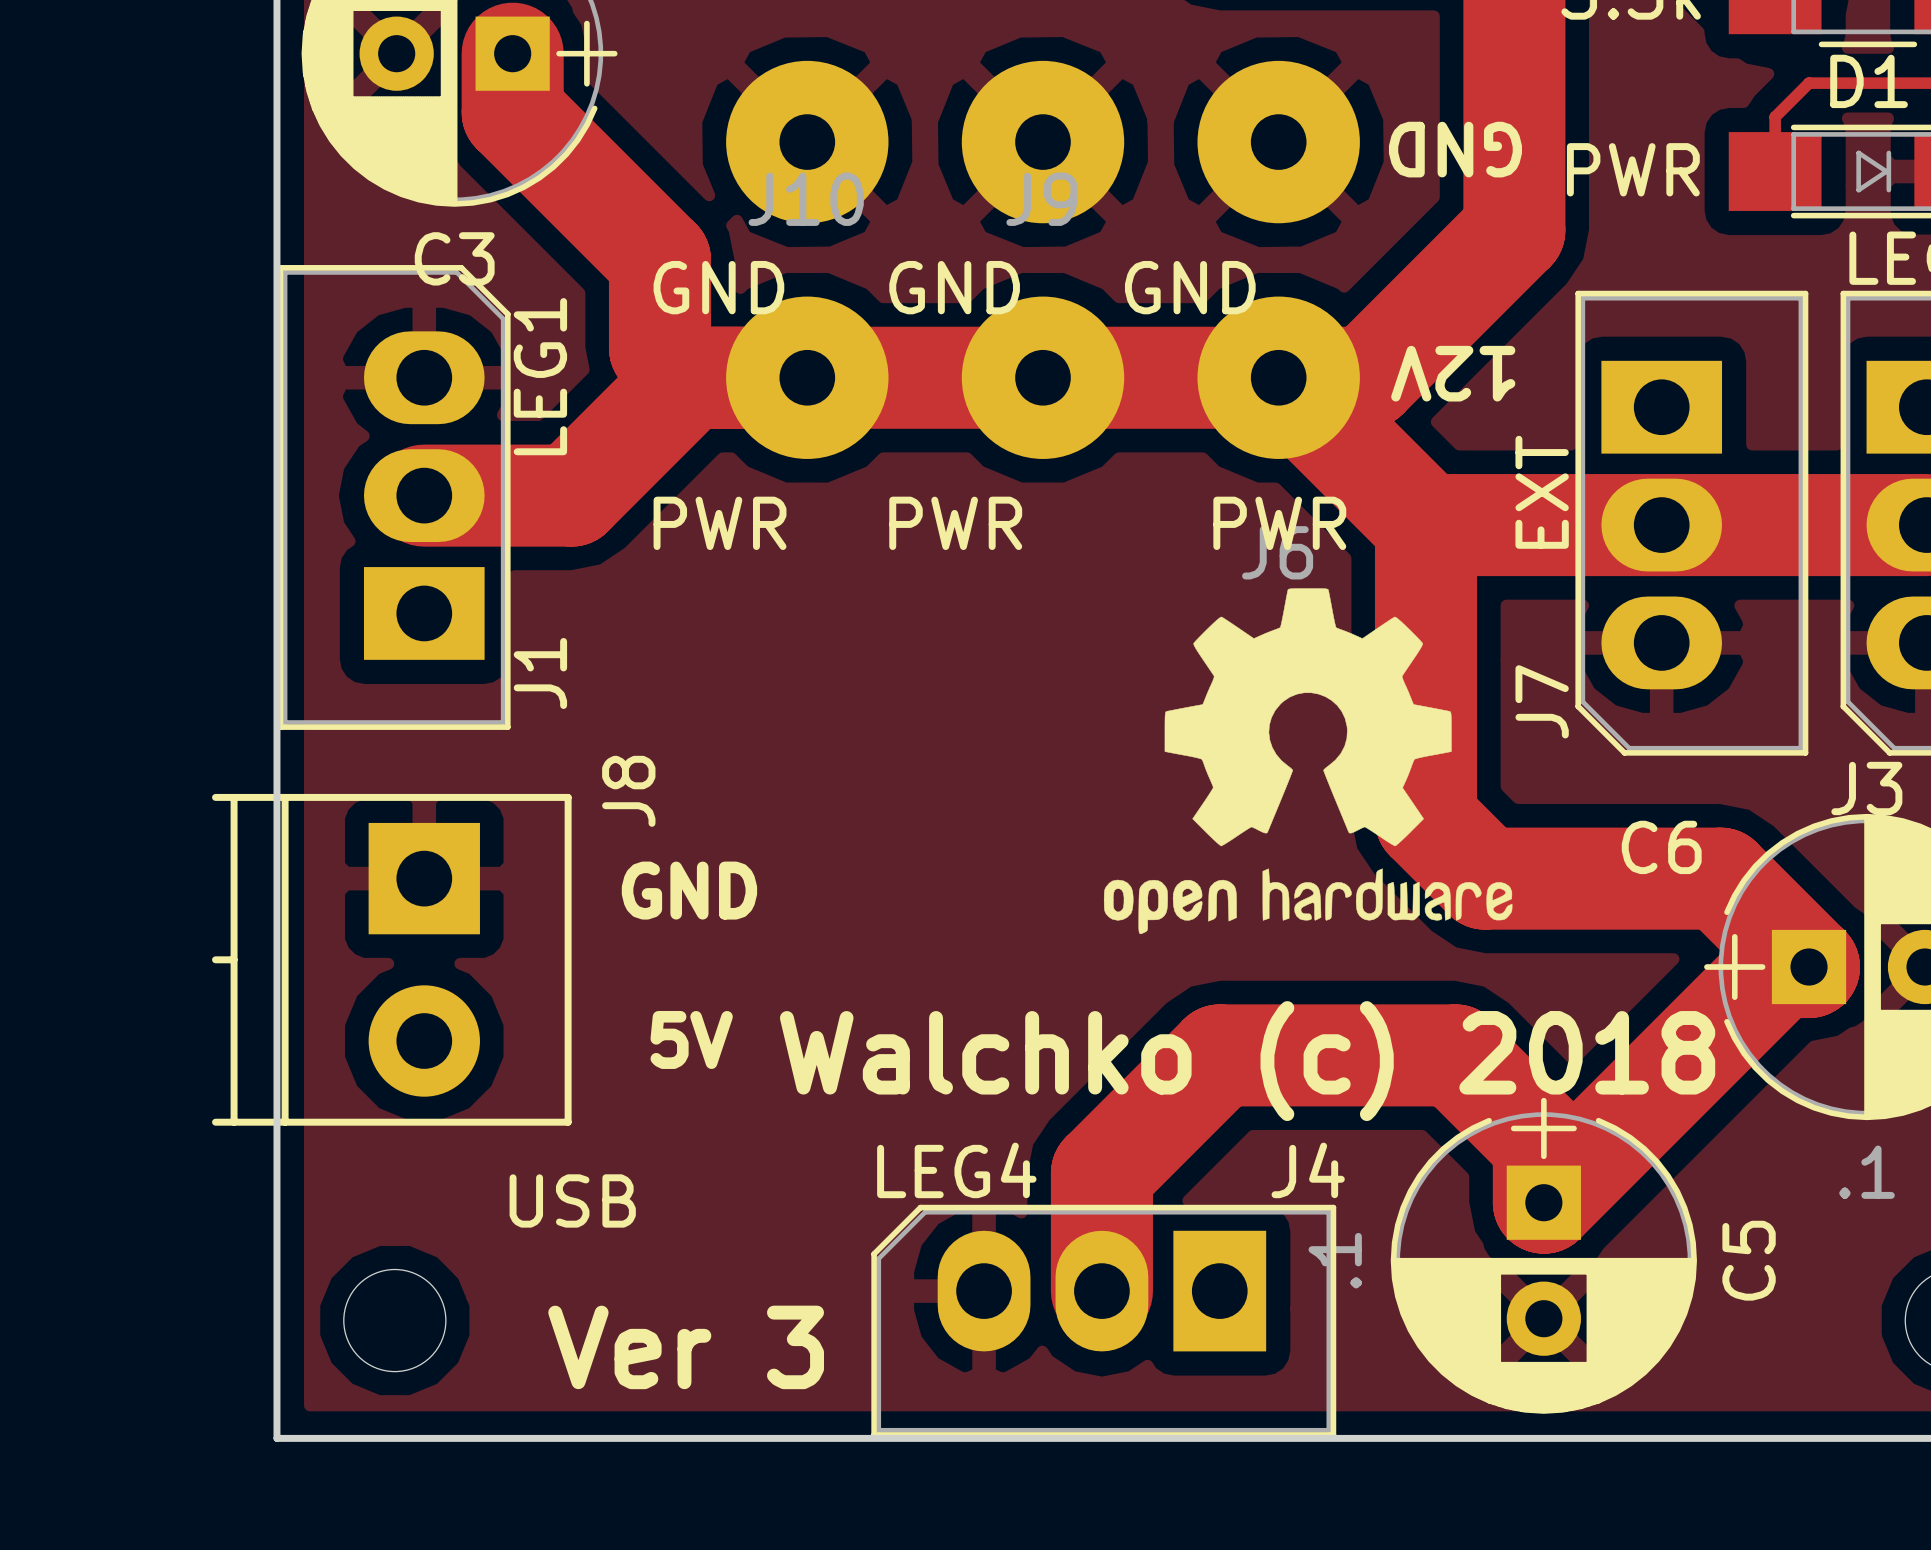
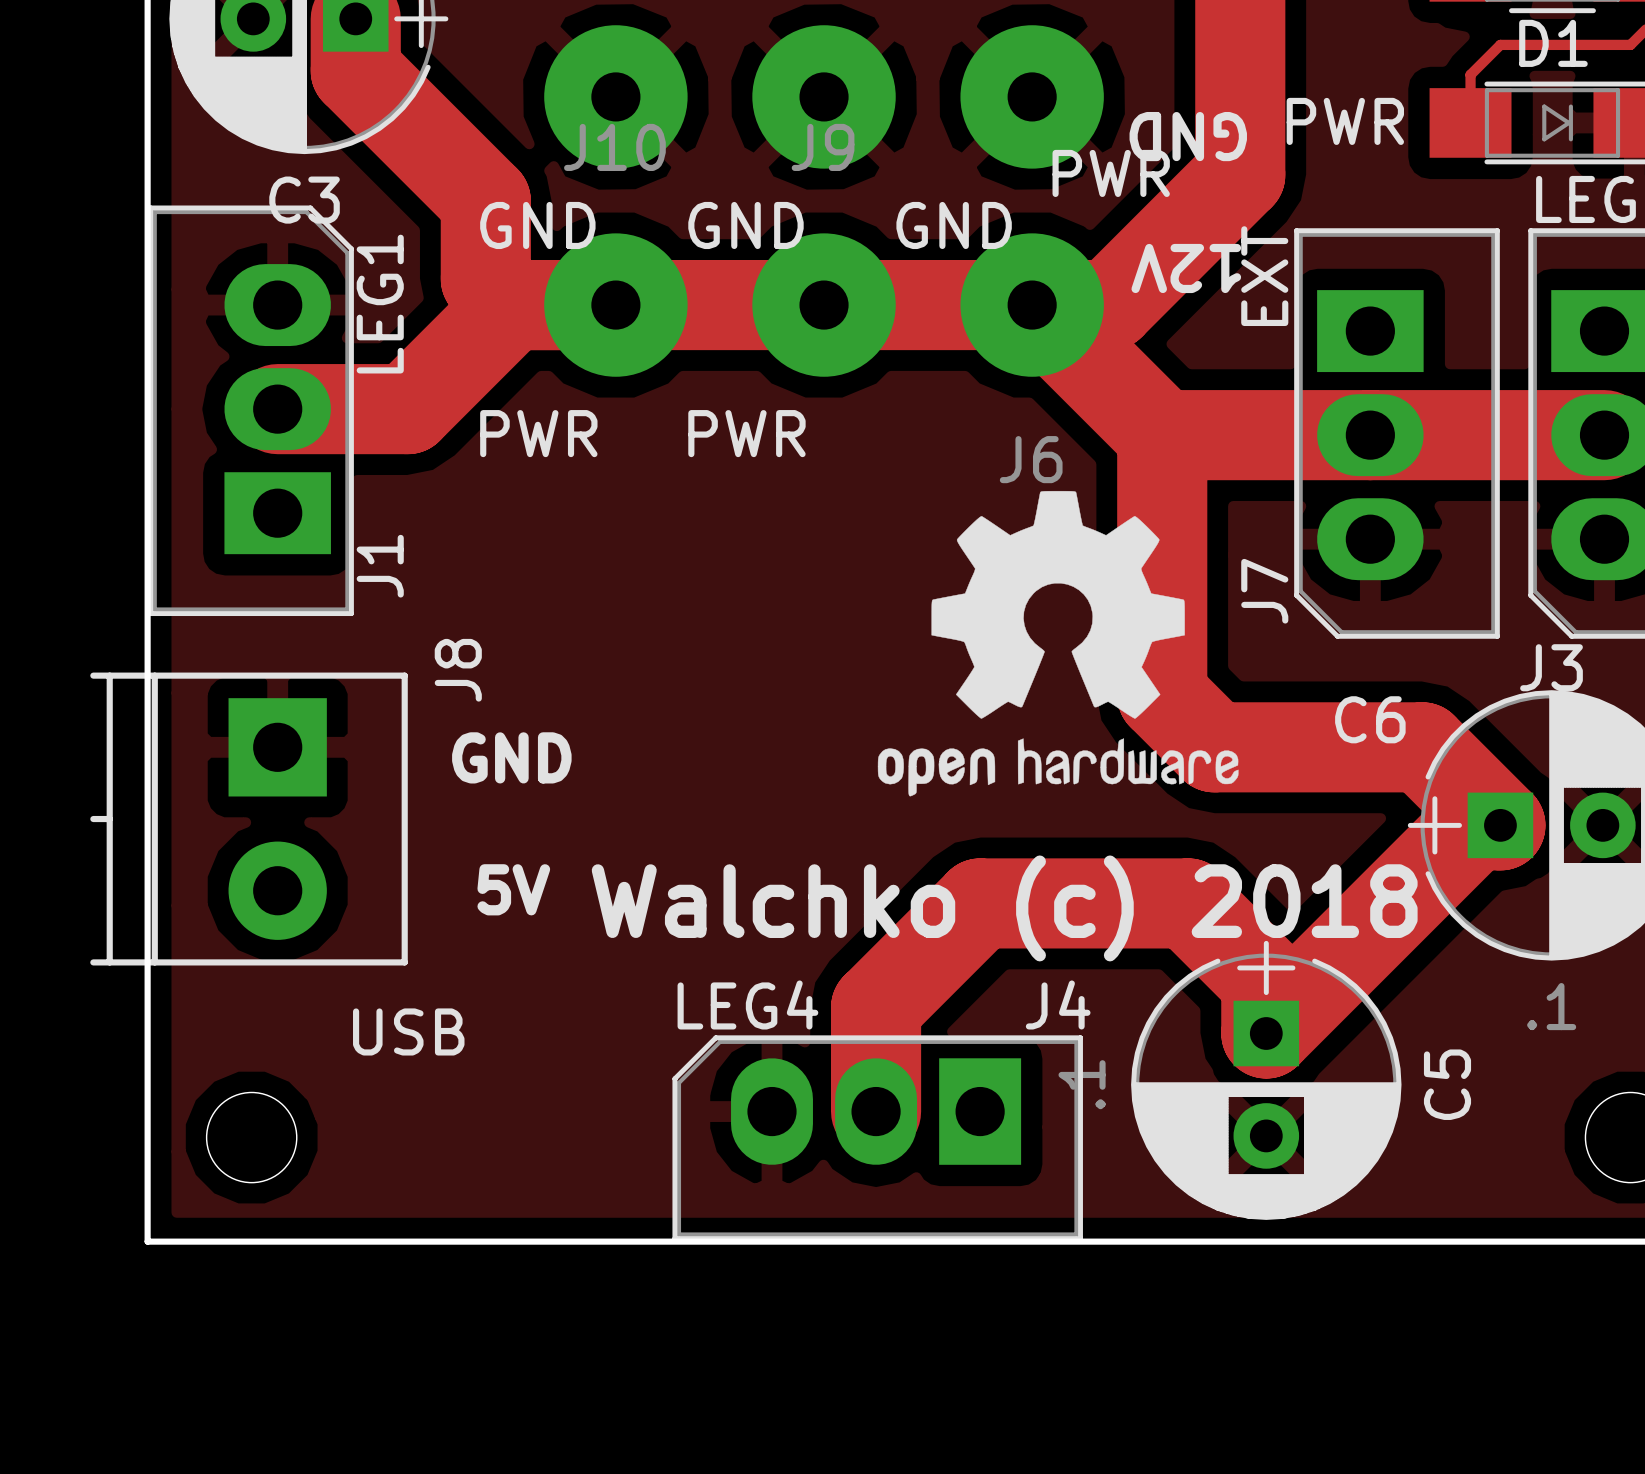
text position: GND (1455, 149) -> GND (1188, 136)
text position: 12V (1453, 373) -> 12V (1186, 268)
J7 value position: EXT (1542, 492) -> EXT (1264, 276)
J6 value position: PWR (1279, 523) -> PWR (1111, 173)
text: Ver 3 (686, 1347) -> none

